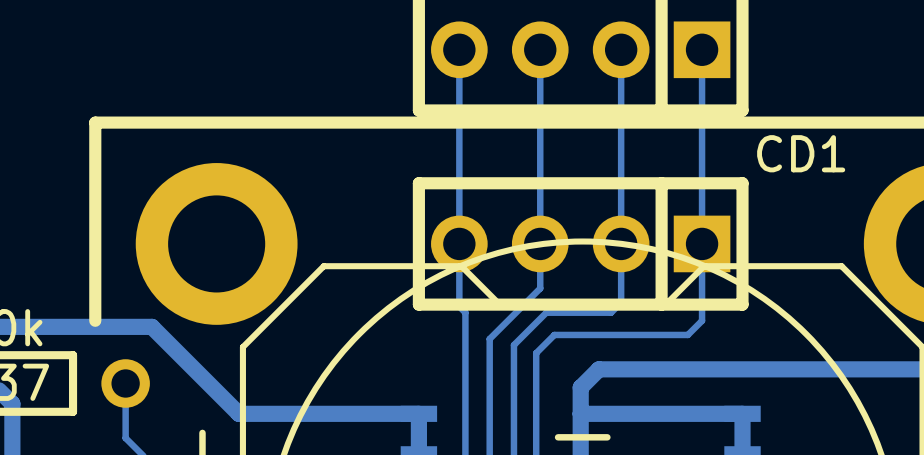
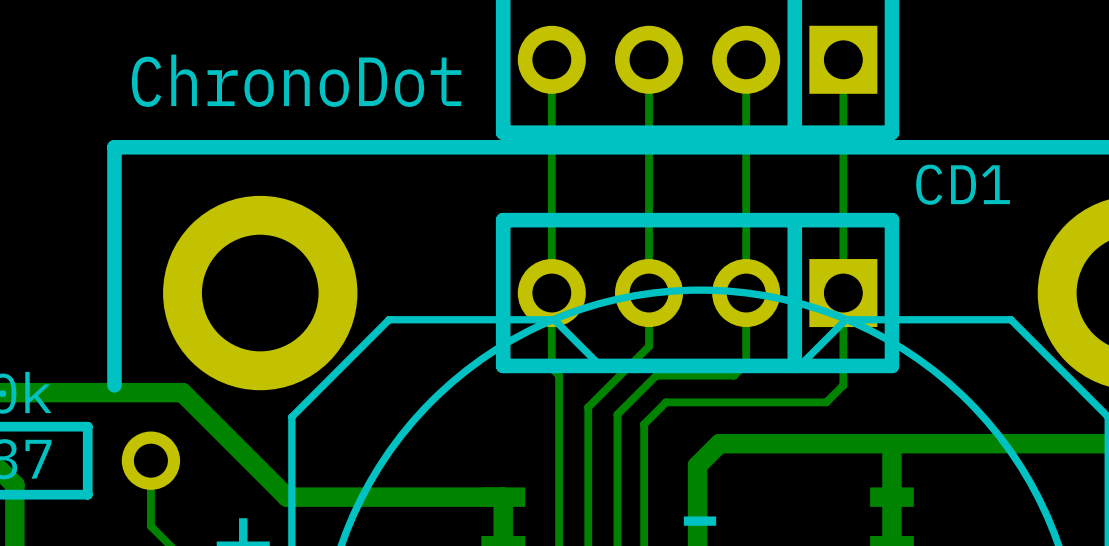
text: none -> ChronoDot (296, 80)
bottom track: (580, 413) (742, 413) -> (891, 443) (891, 497)

